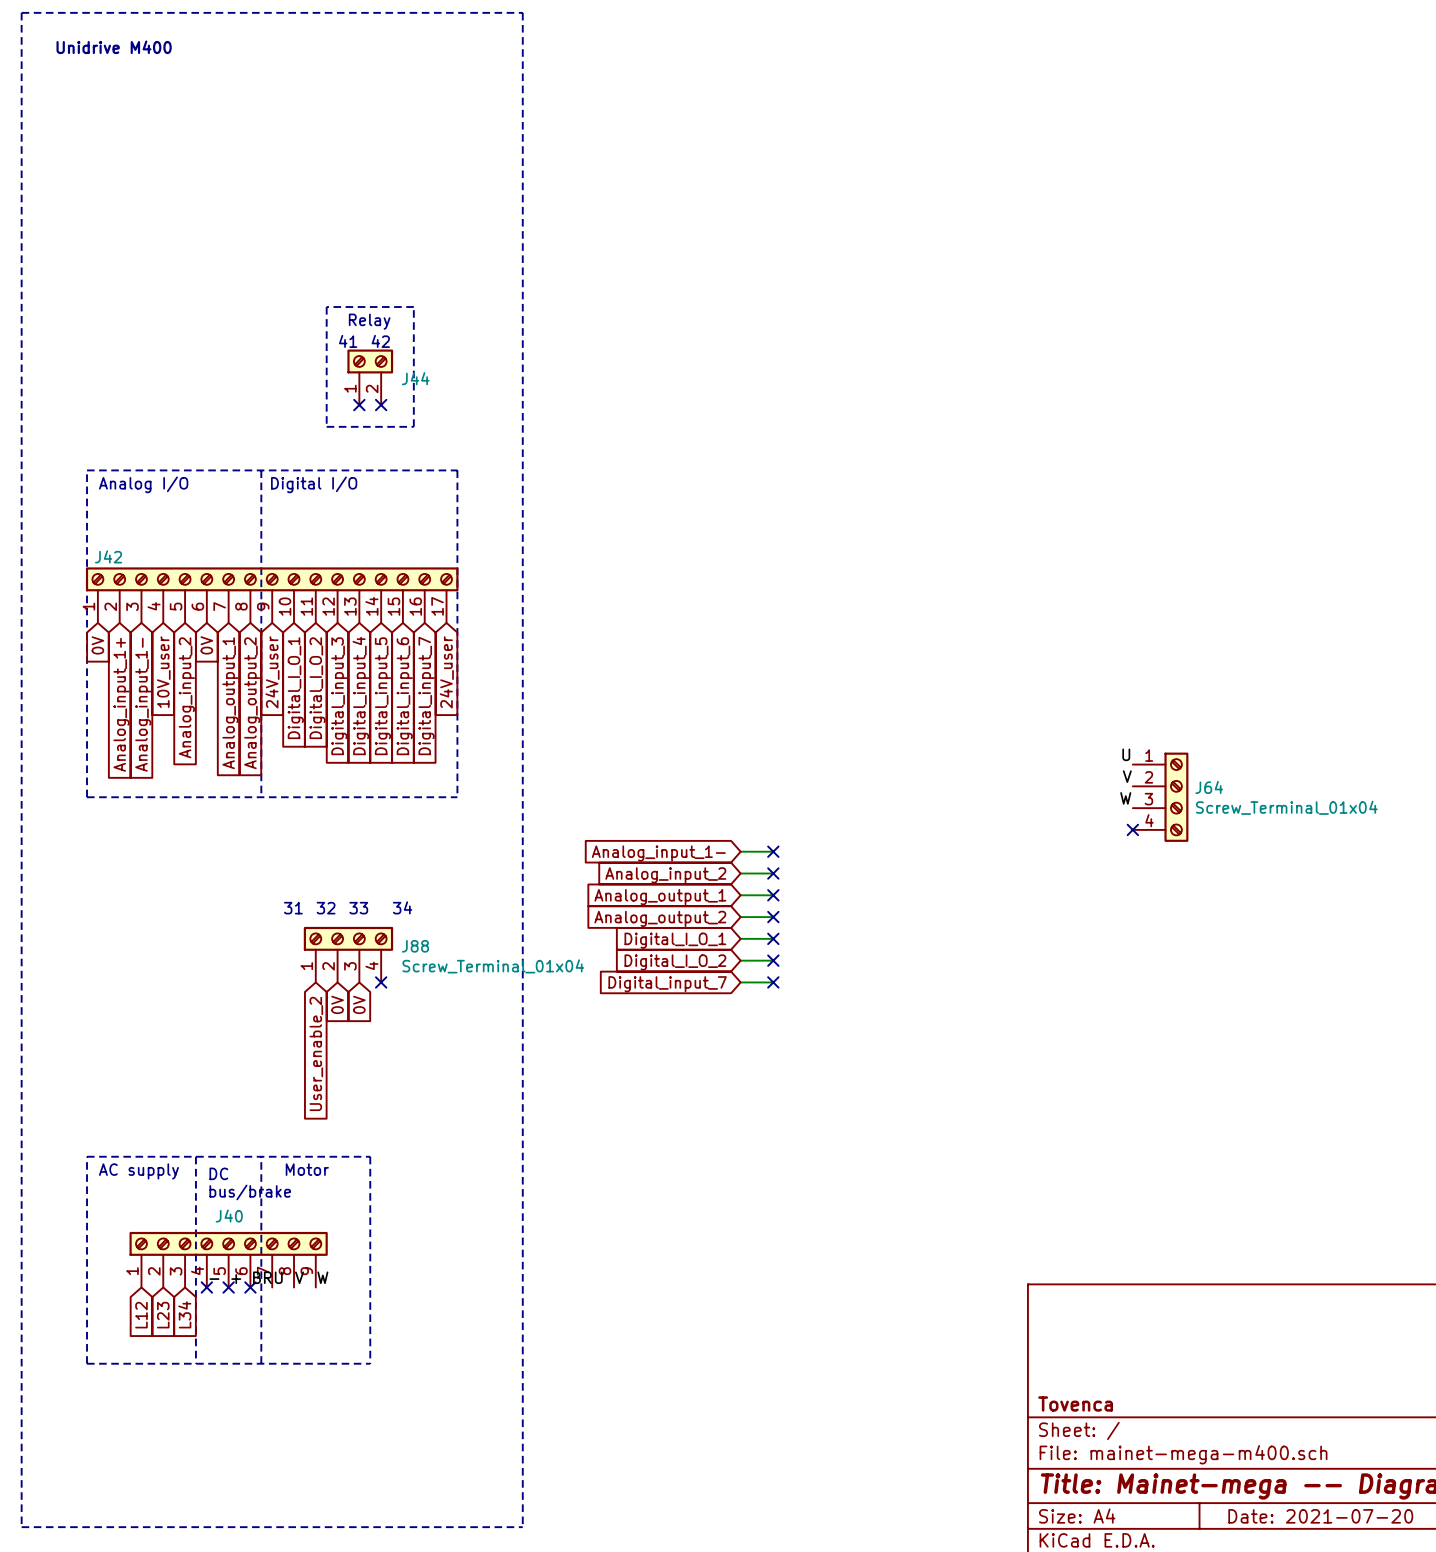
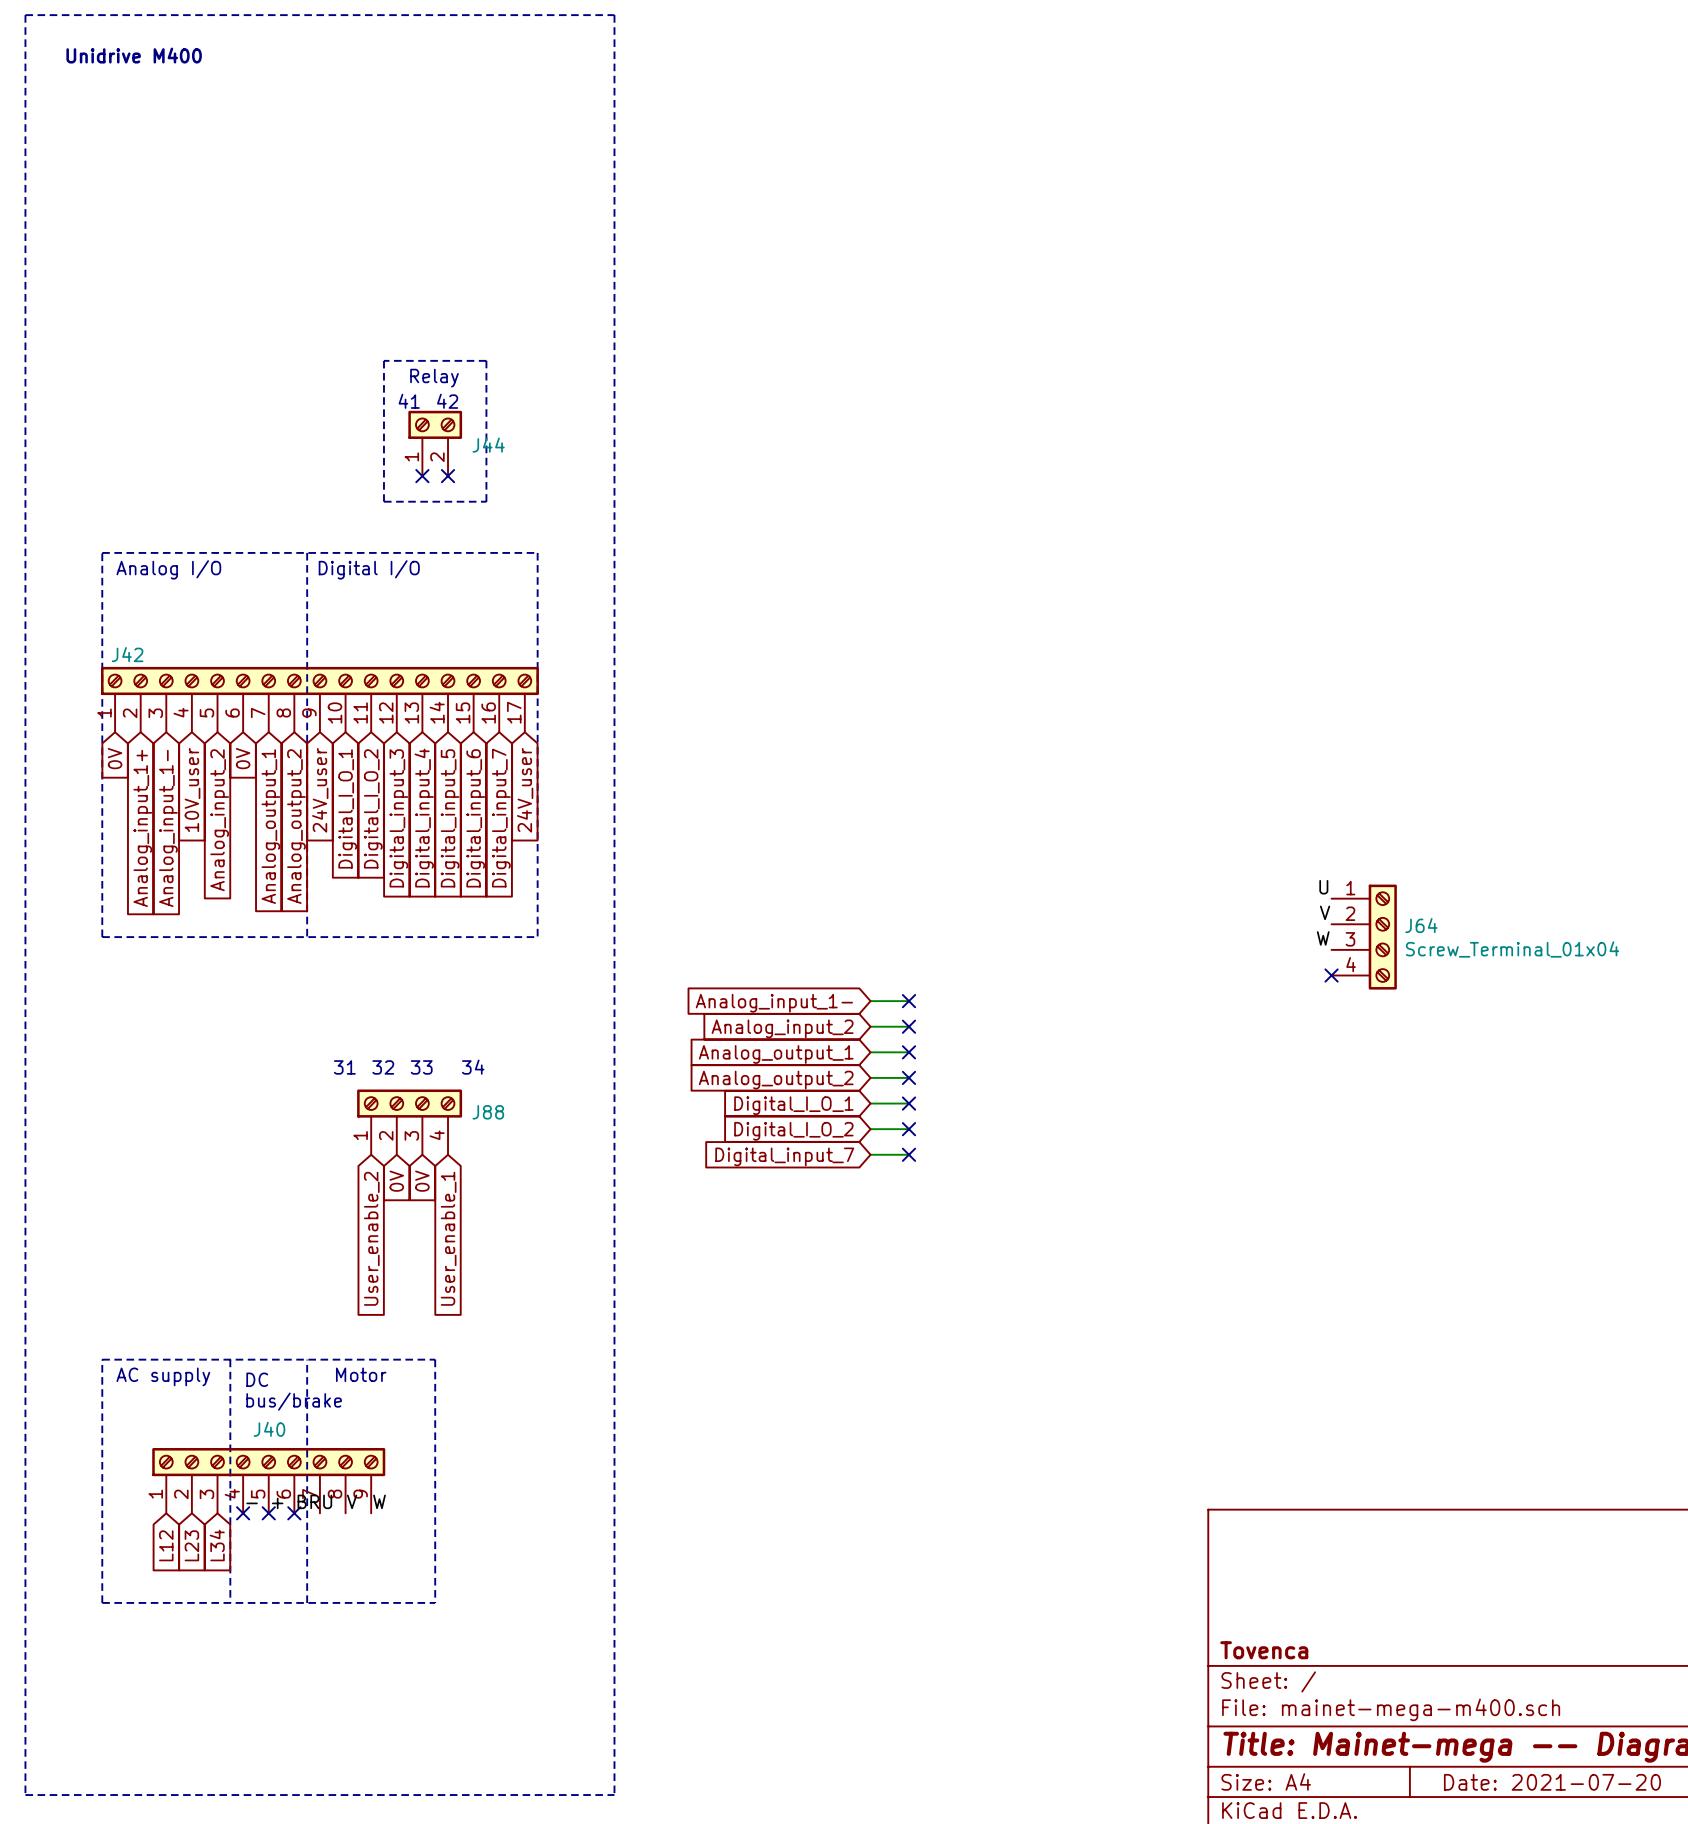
J88 value: Screw_Terminal_01x04 (493, 966) -> none
no-connect mark: (381, 982) -> none
global label: none -> User_enable_1 (448, 1238)

